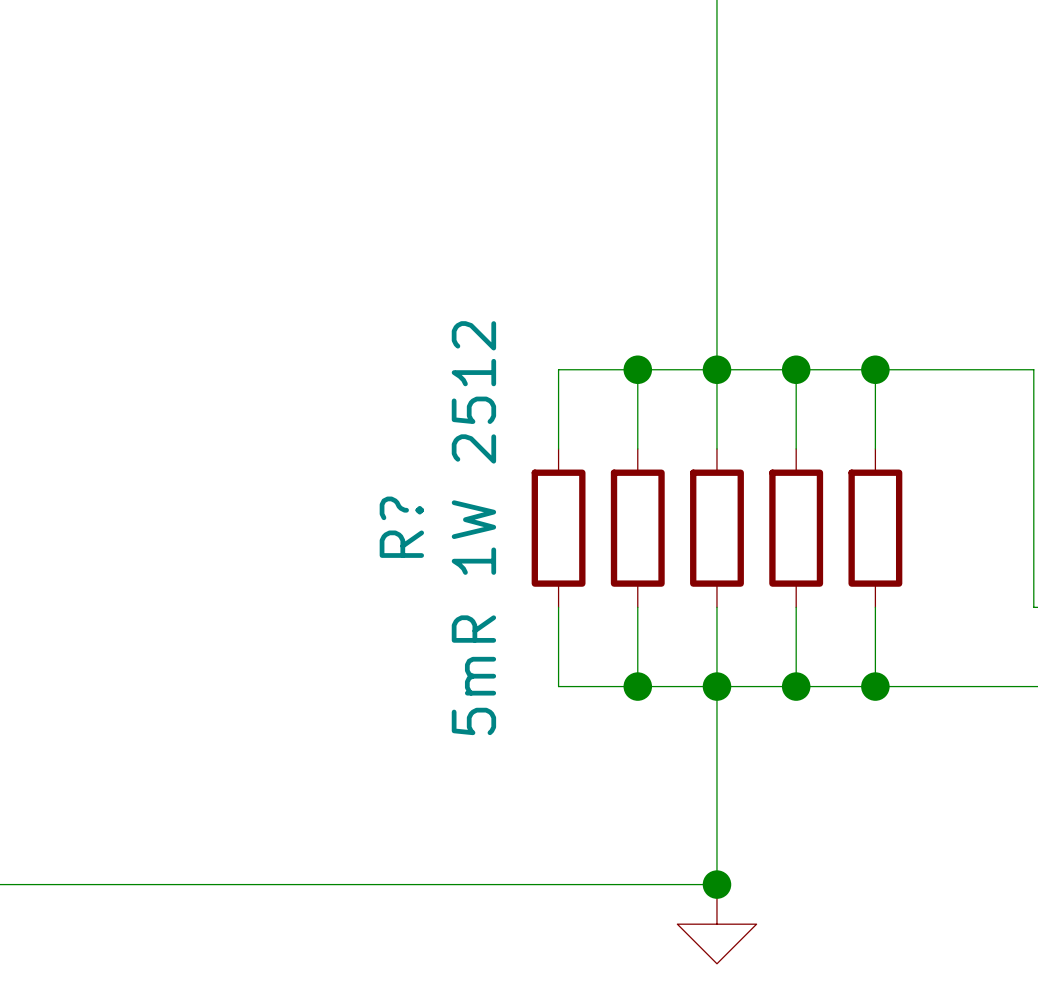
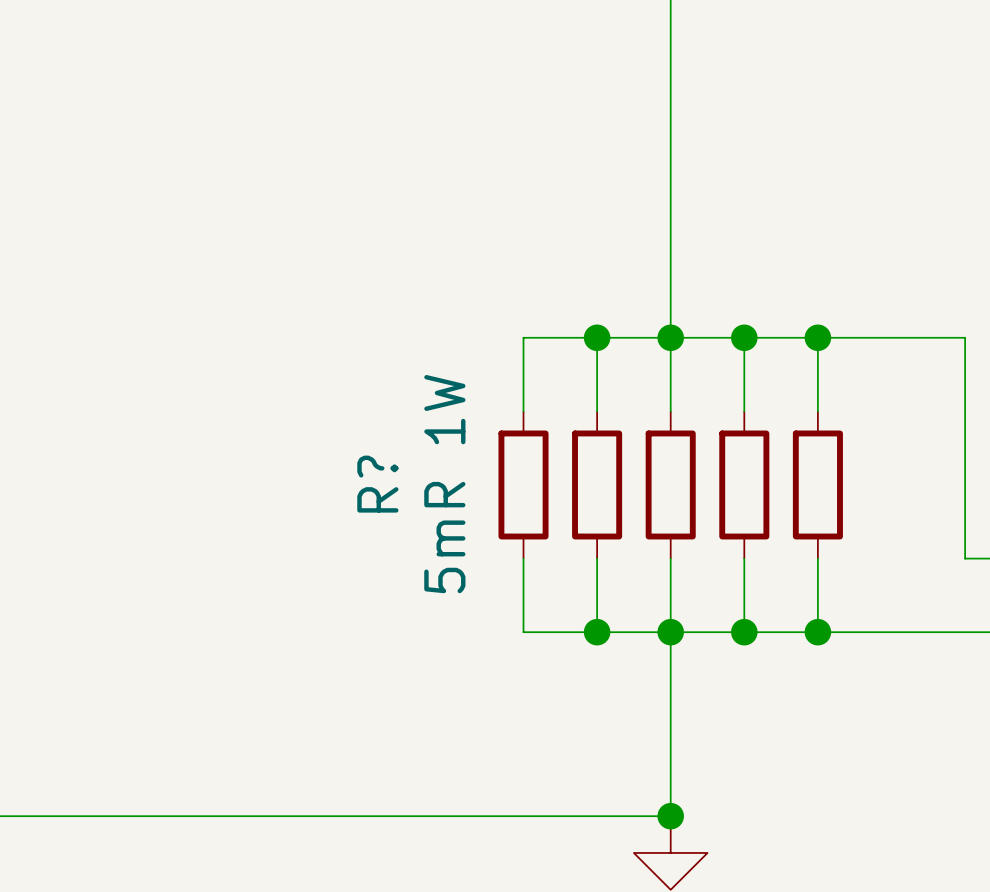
R? value: 5mR 1W 2512 (473, 528) -> 5mR 1W (444, 484)

